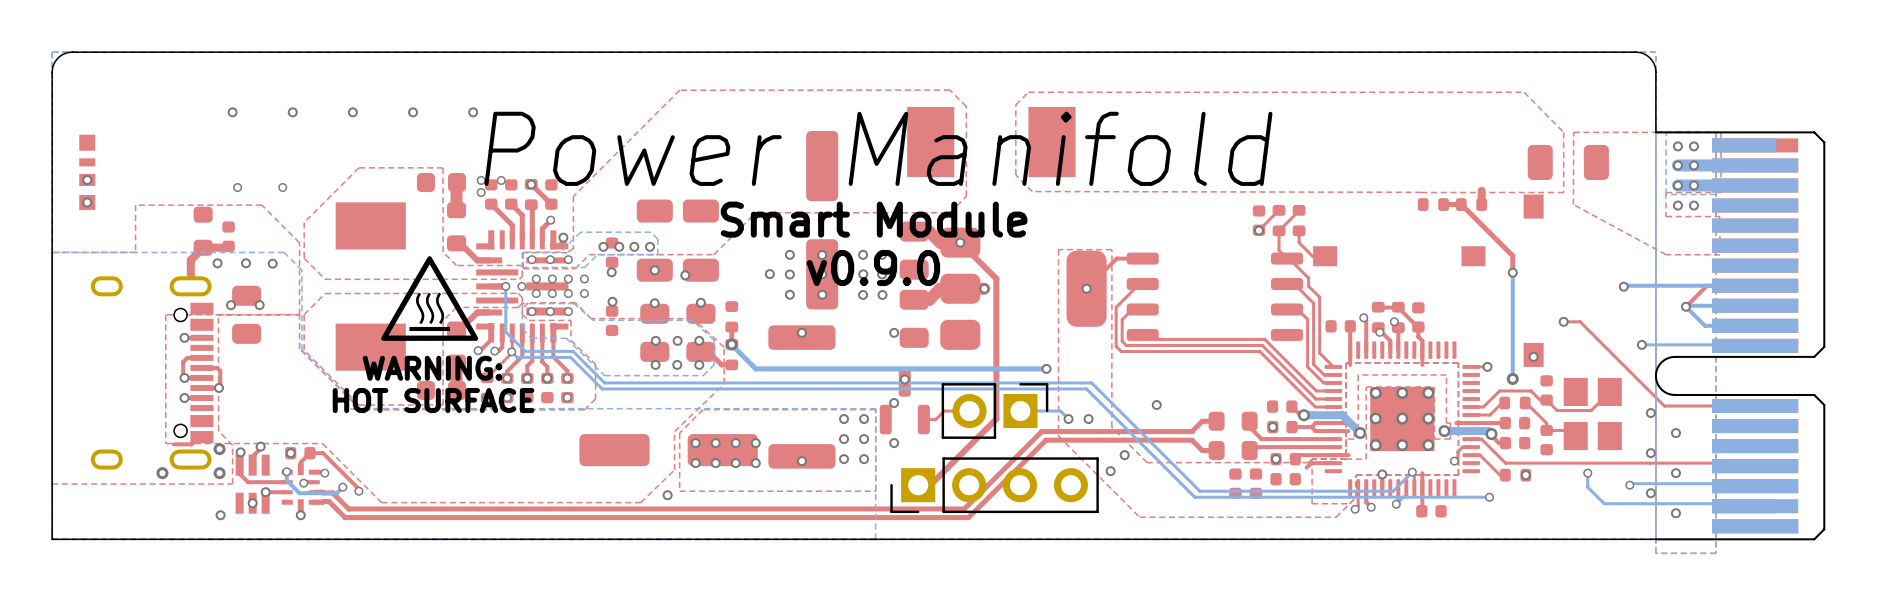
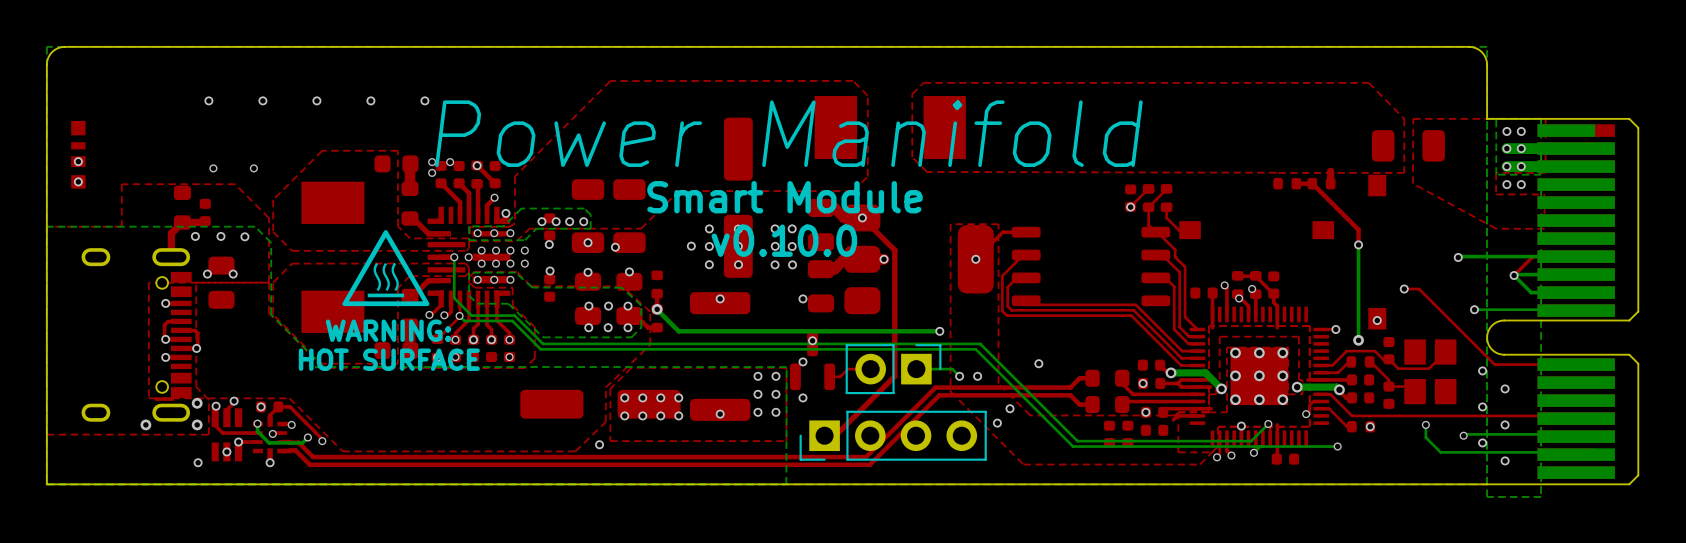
text: v0.9.0 (873, 268) -> v0.10.0 (784, 240)

